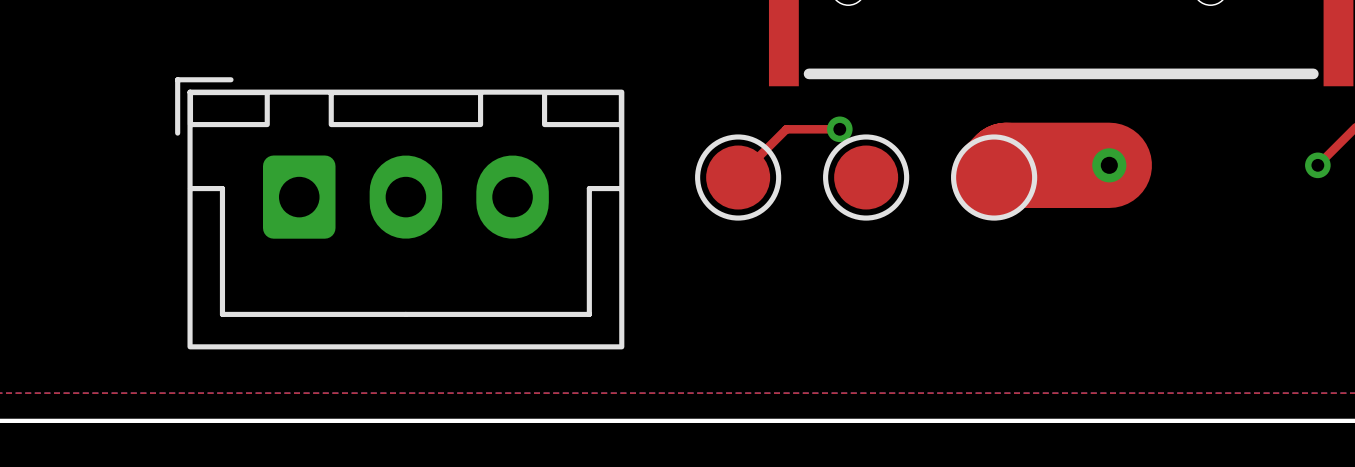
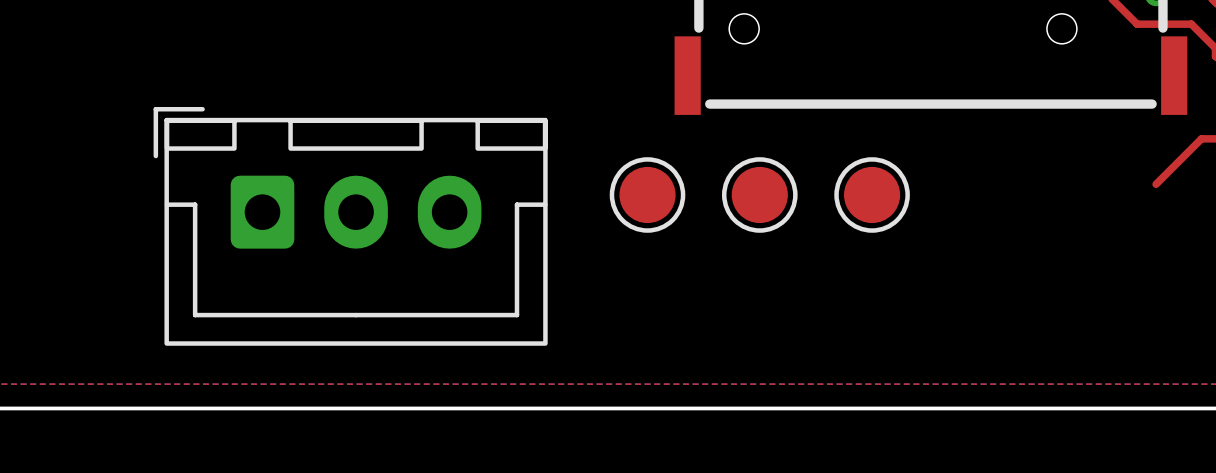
top track: (839, 129) (786, 129) (738, 177) -> none
via: (839, 129) -> none
top track: (1109, 165) (1006, 165) (994, 177) -> none
via: (1109, 165) -> none
via: (1317, 165) -> none

